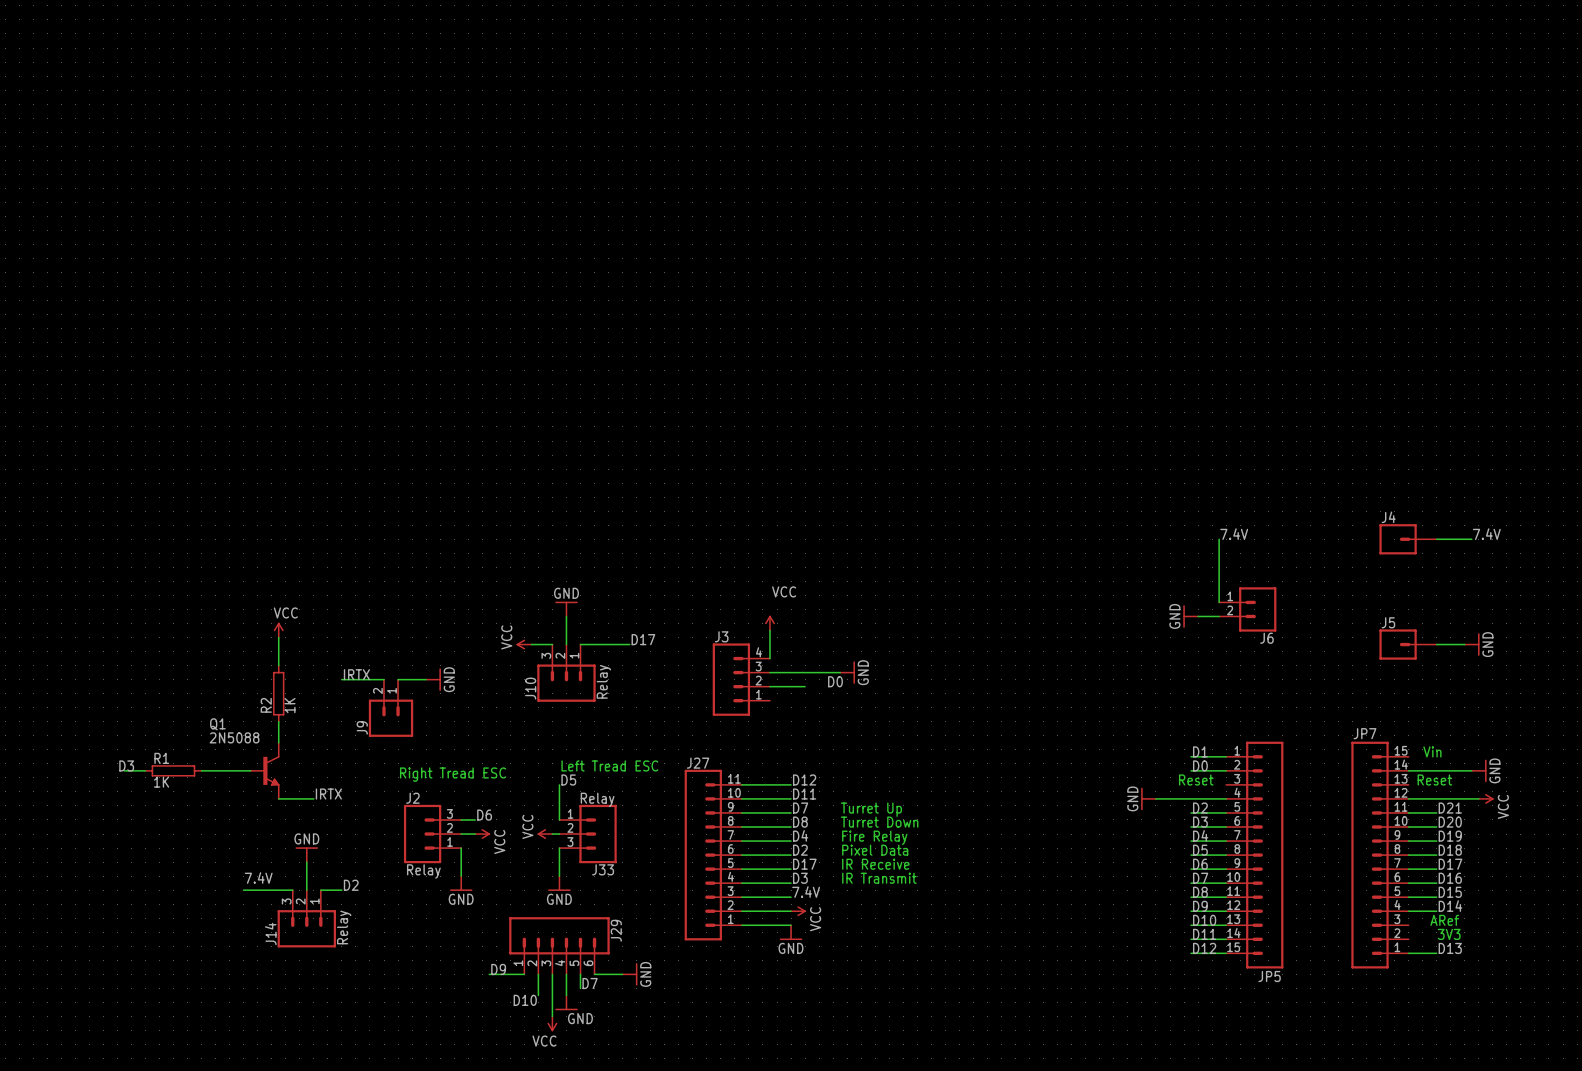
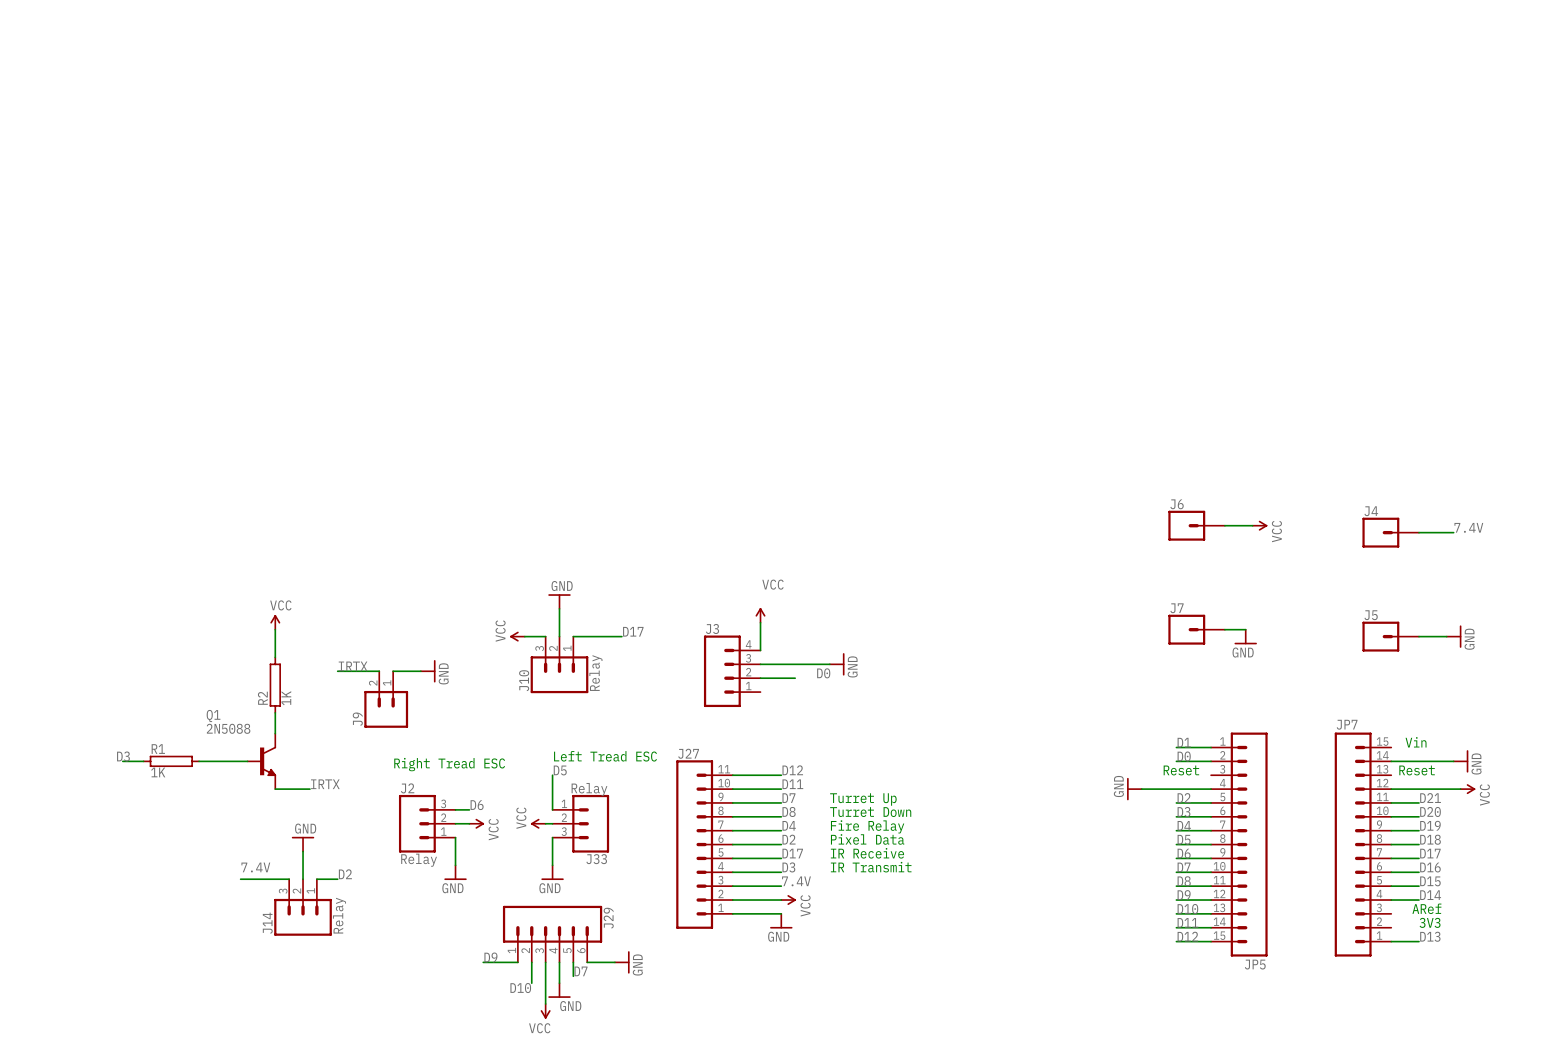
wire: none -> (1224, 525) (1252, 525)
power symbol: none -> VCC (1259, 525)
label: 7.4V (1234, 534) -> none
wire: (1219, 539) (1219, 602) -> none
J6 symbol: [1219, 587, 1277, 632] -> [1168, 510, 1225, 541]
power symbol rotation: 0° (1184, 616) -> 90° counterclockwise (1245, 643)
power symbol position: GND (1190, 616) -> GND (1245, 636)
wire: (1198, 616) (1219, 616) -> (1224, 629) (1245, 629)
J7: none -> (1196, 629)
J6 name position: J6 (1266, 638) -> J6 (1177, 504)

